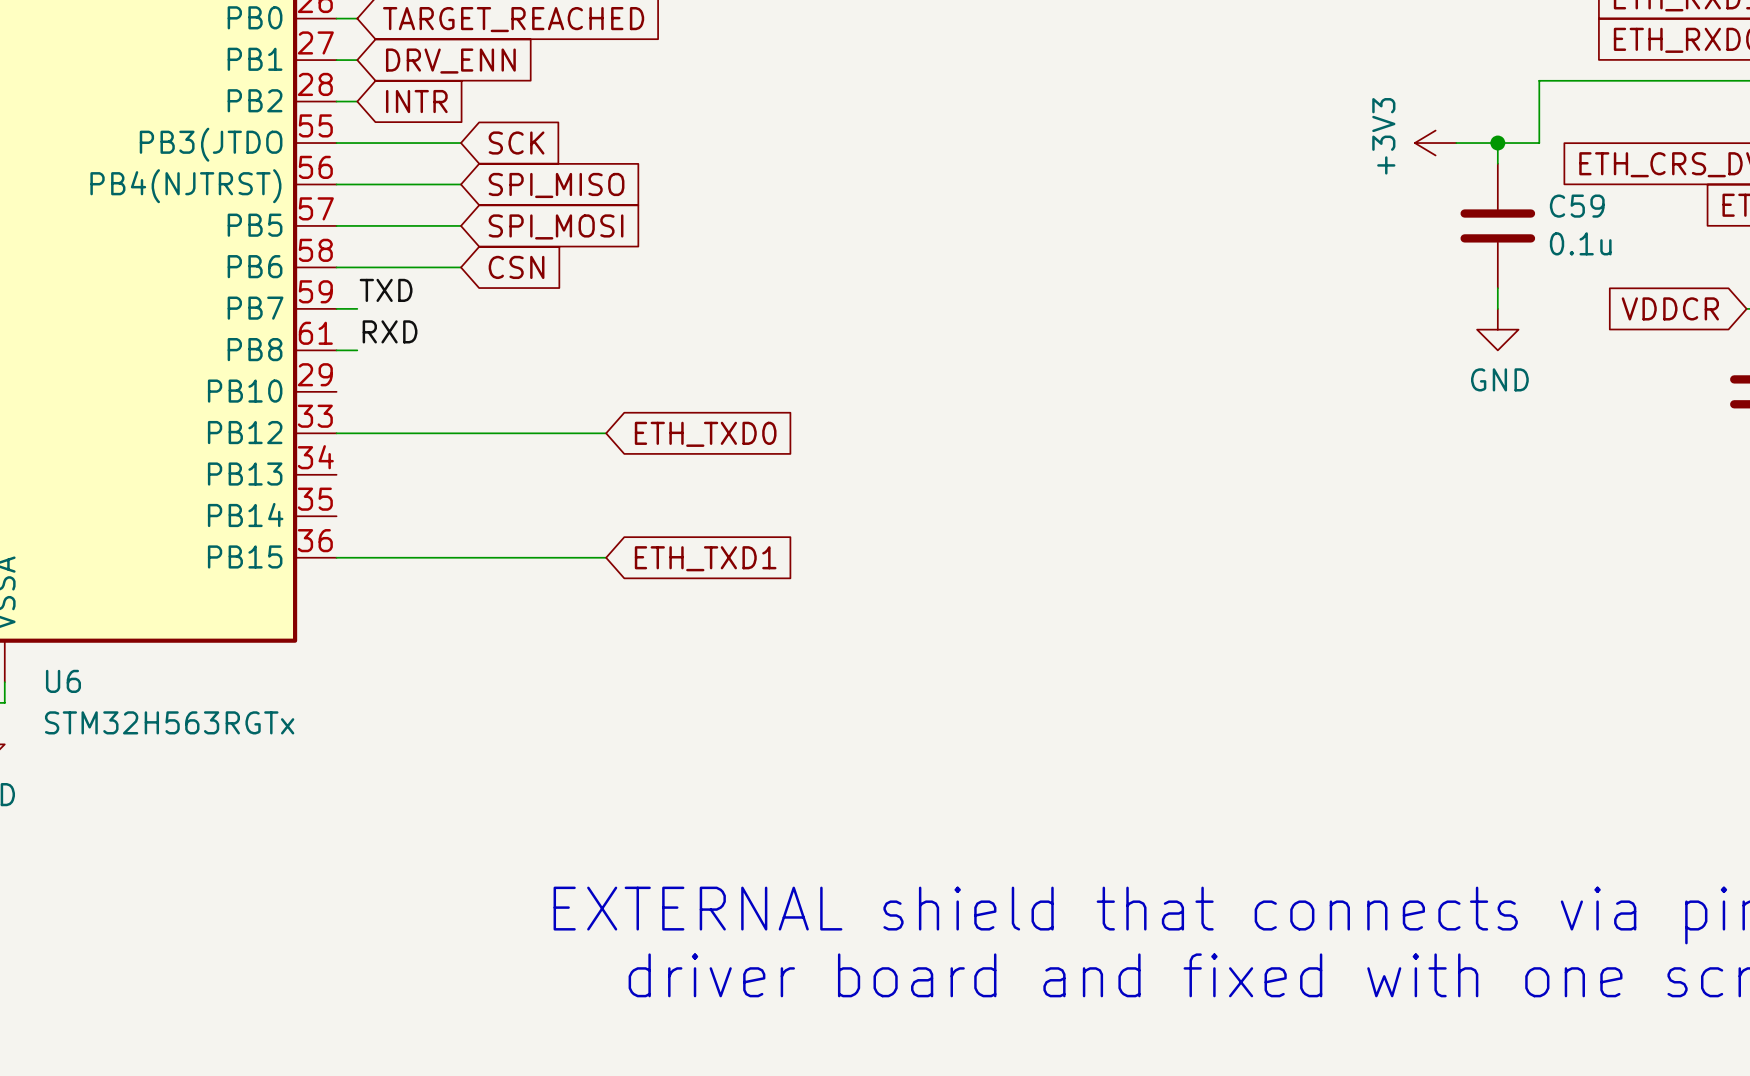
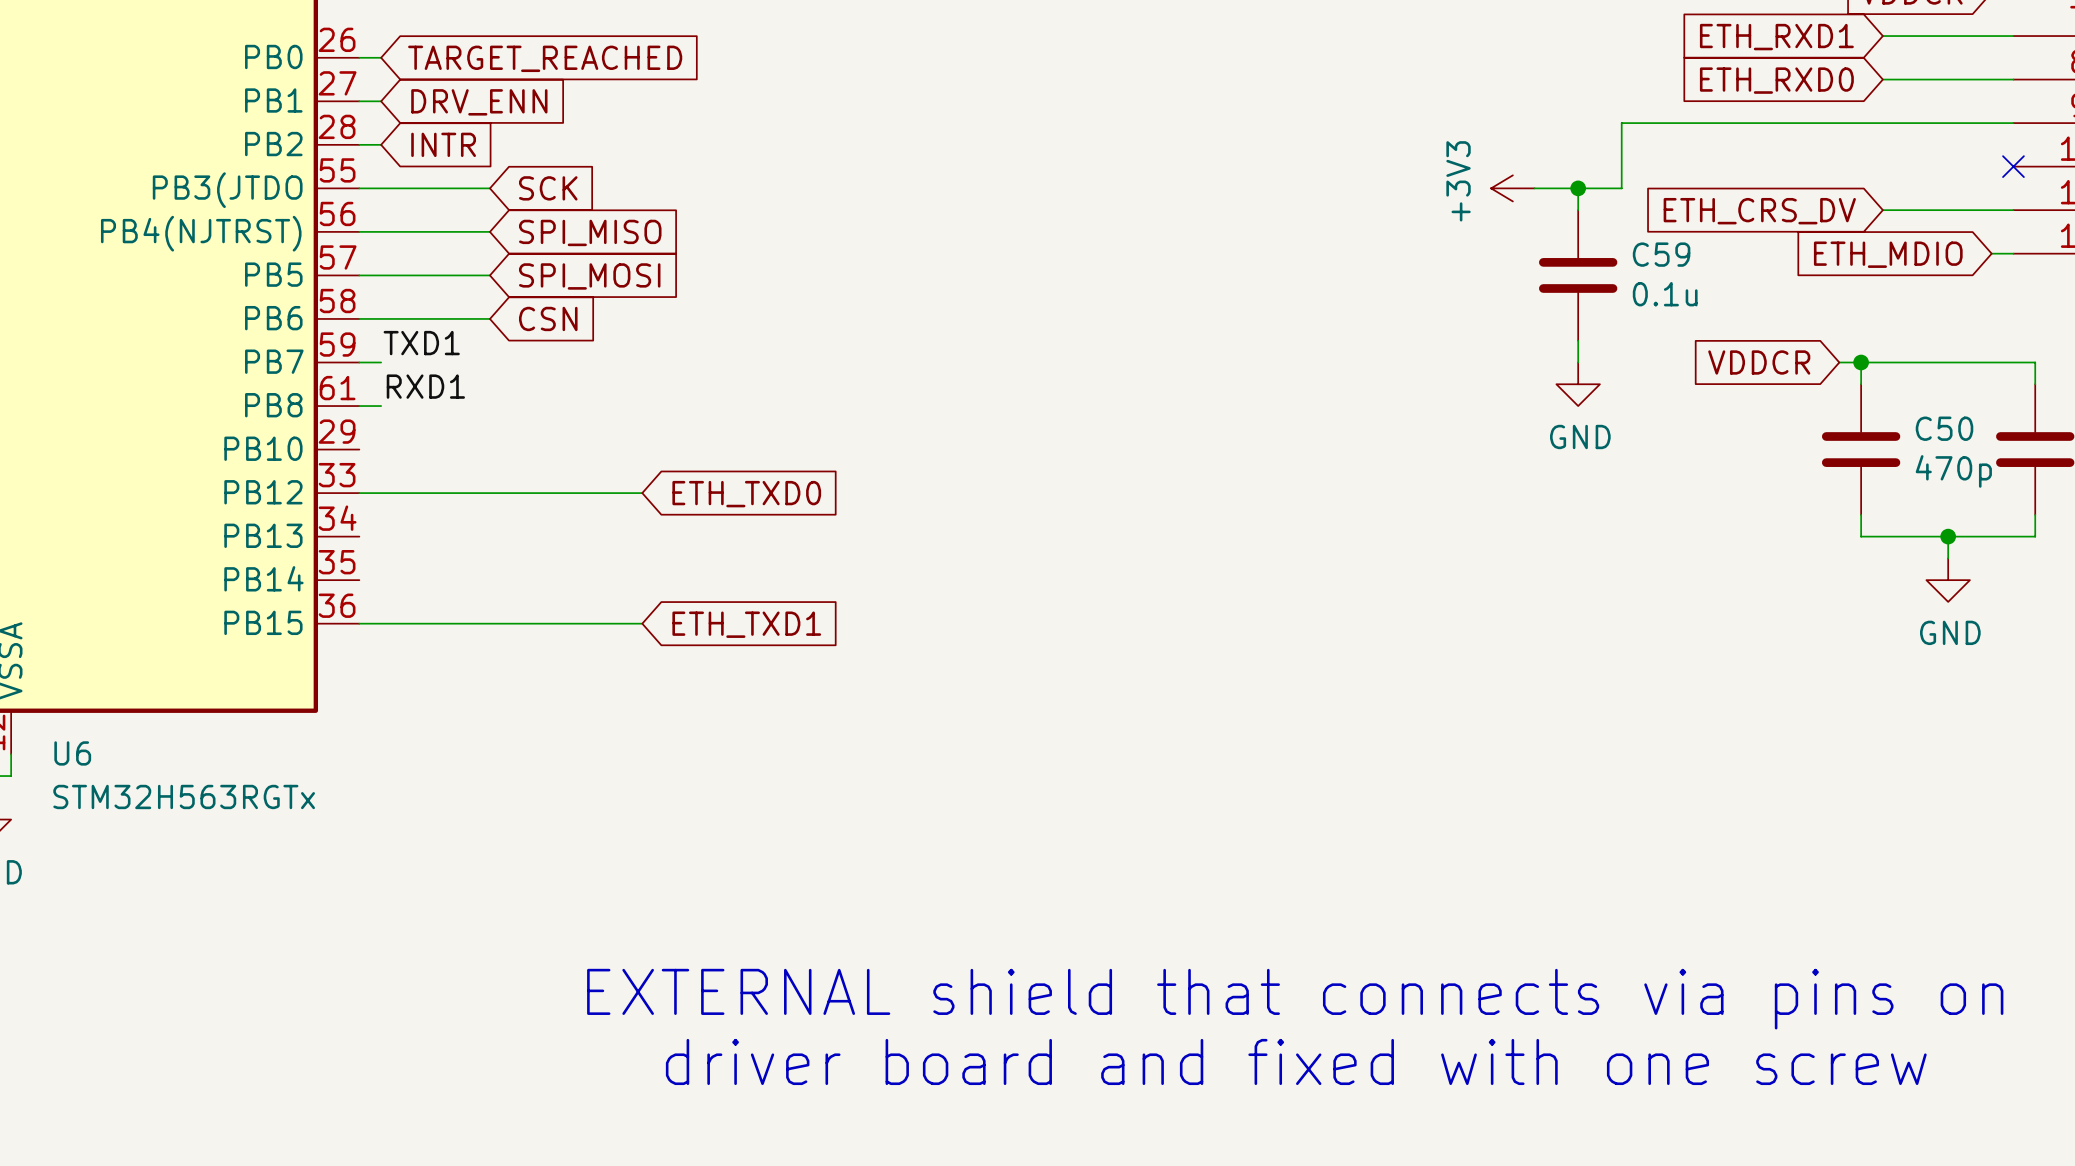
label: TXD (386, 290) -> TXD1 (421, 343)
label: RXD (390, 331) -> RXD1 (425, 386)

